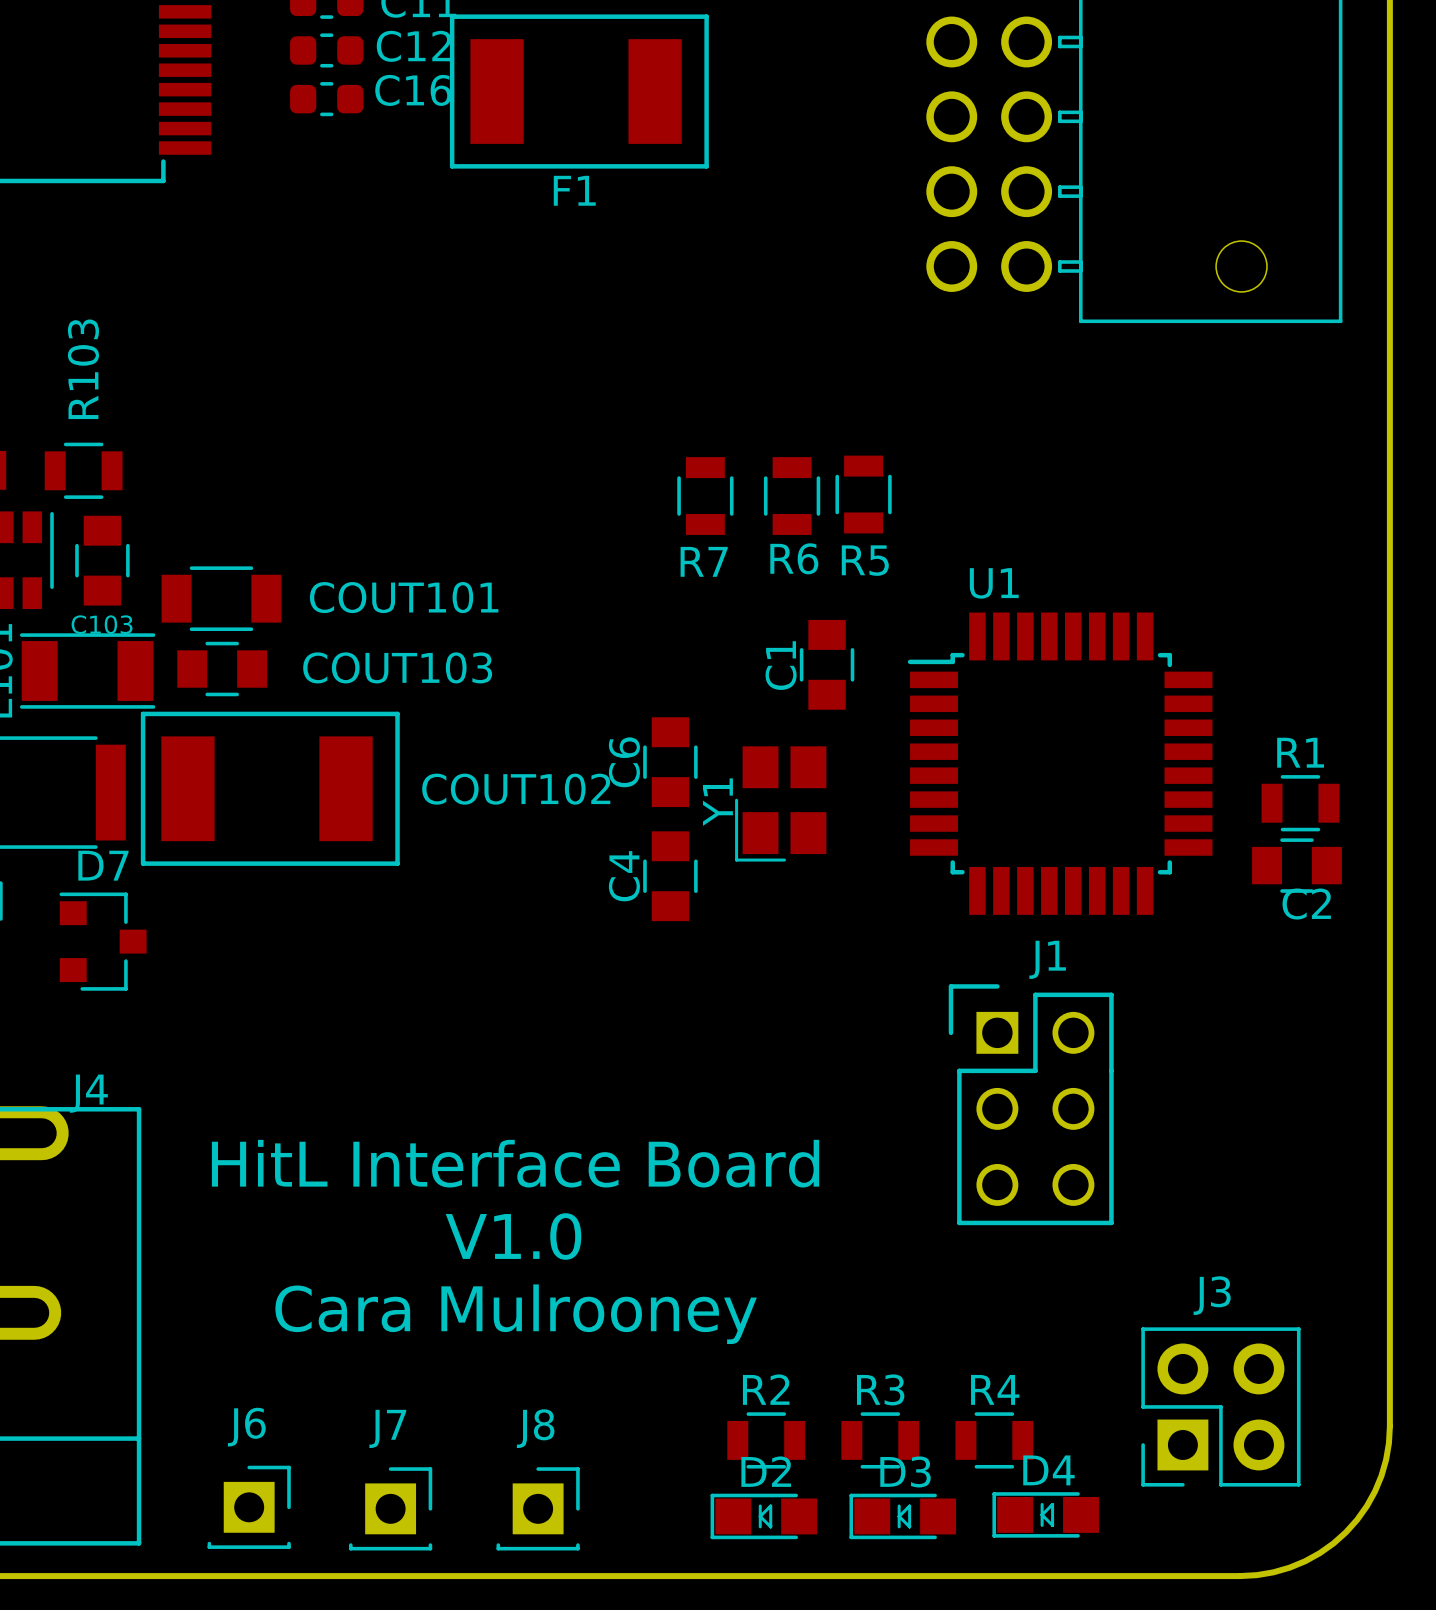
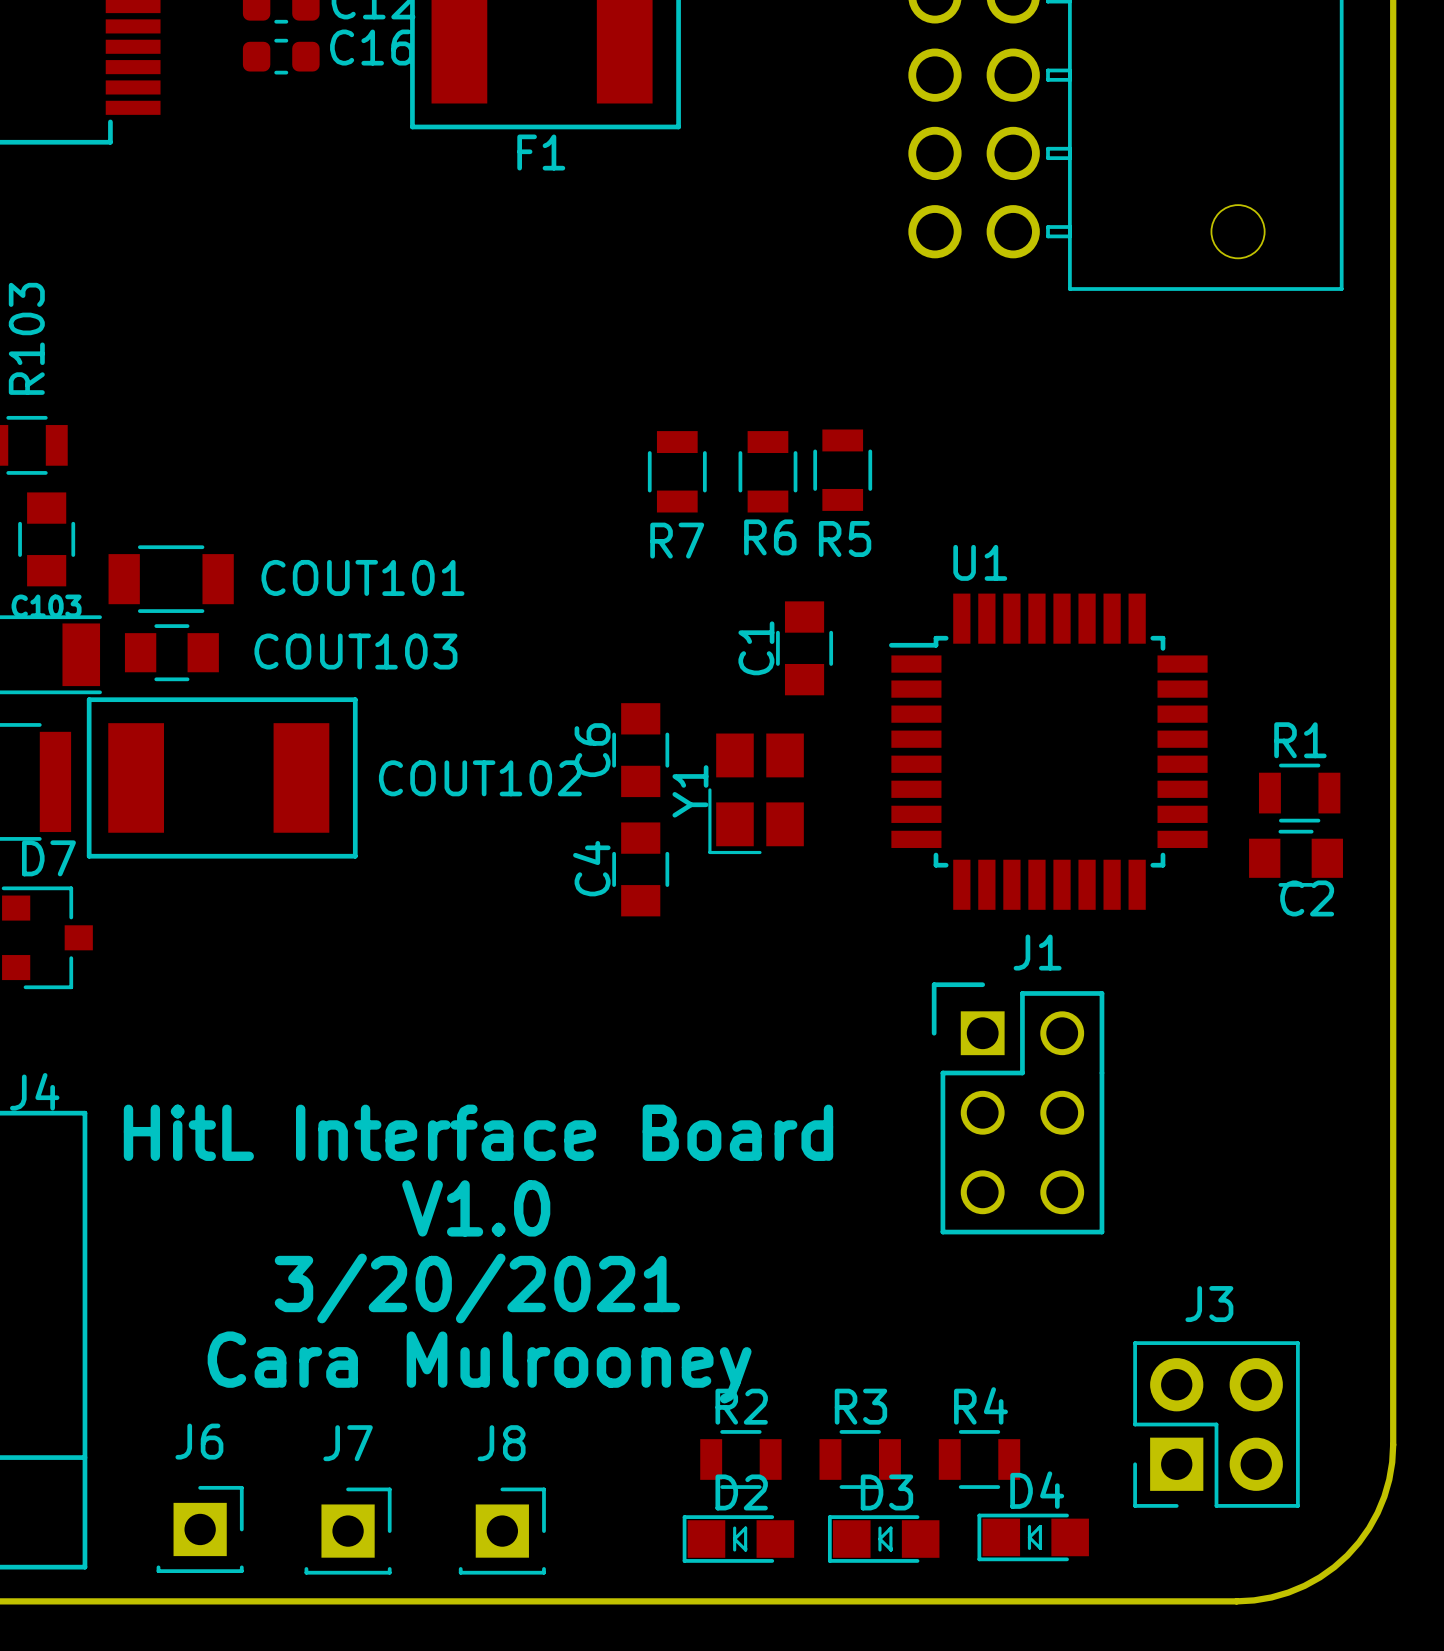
text position: HitL Interface Board (515, 1163) -> HitL Interface Board (478, 1132)
text position: V1.0 (513, 1236) -> V1.0 (476, 1208)
text: none -> 3/20/2021 (477, 1288)
text position: Cara Mulrooney (516, 1314) -> Cara Mulrooney (479, 1367)

